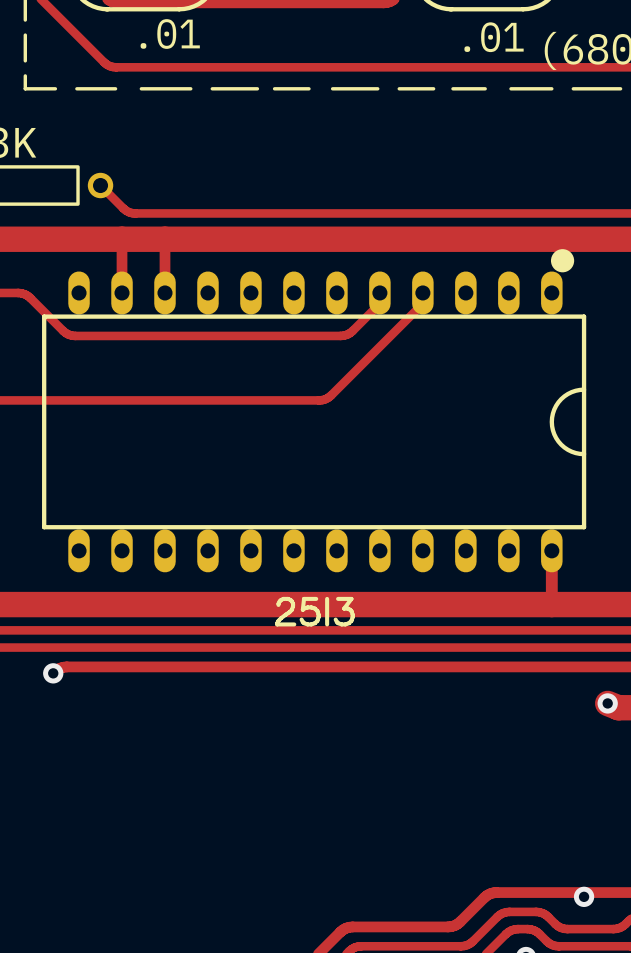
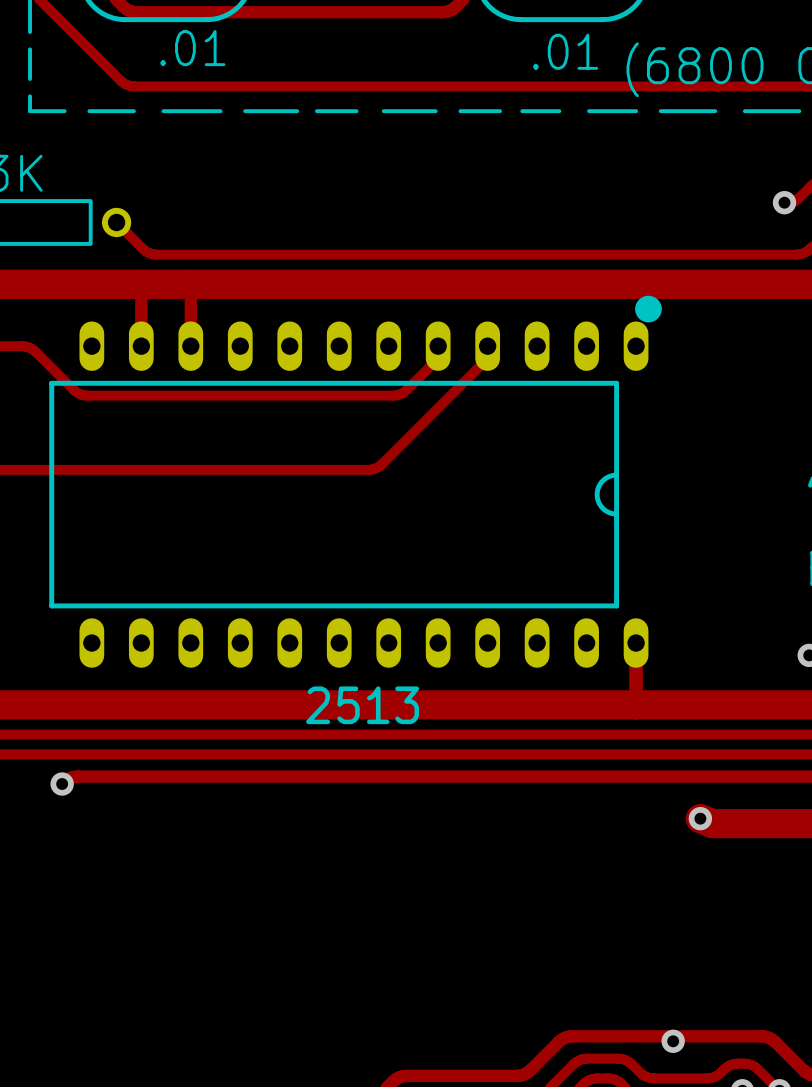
part footprint: [42, 249, 587, 573] -> [49, 295, 662, 668]
line: (316, 598) (304, 598) (302, 609) (307, 607) (315, 608) (318, 614) (317, 620) (307, 624) (301, 619) -> none
line: (327, 598) (327, 624) -> none
line: (338, 598) (351, 598) (344, 608) (350, 609) (352, 617) (349, 623) (345, 624) (338, 623) (335, 619) -> none
line: (278, 604) (283, 598) (290, 600) (293, 603) (291, 609) (280, 618) (277, 624) (294, 624) -> none
part value: none -> 2513 (362, 705)

